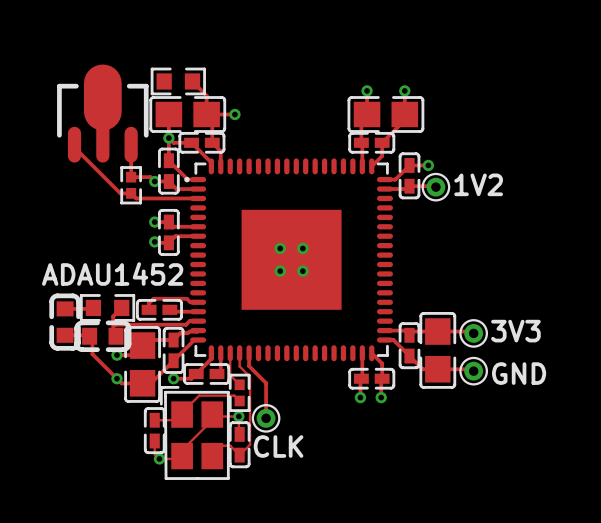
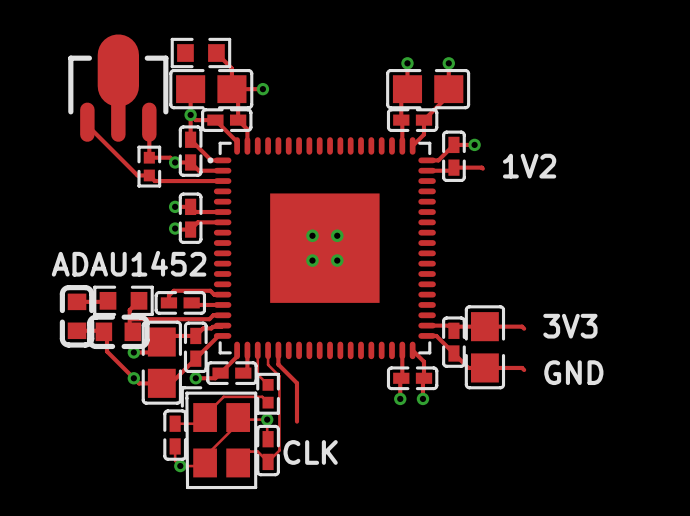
part: (435, 187) -> none
part: (473, 333) -> none
part: (473, 371) -> none
part: (266, 418) -> none

